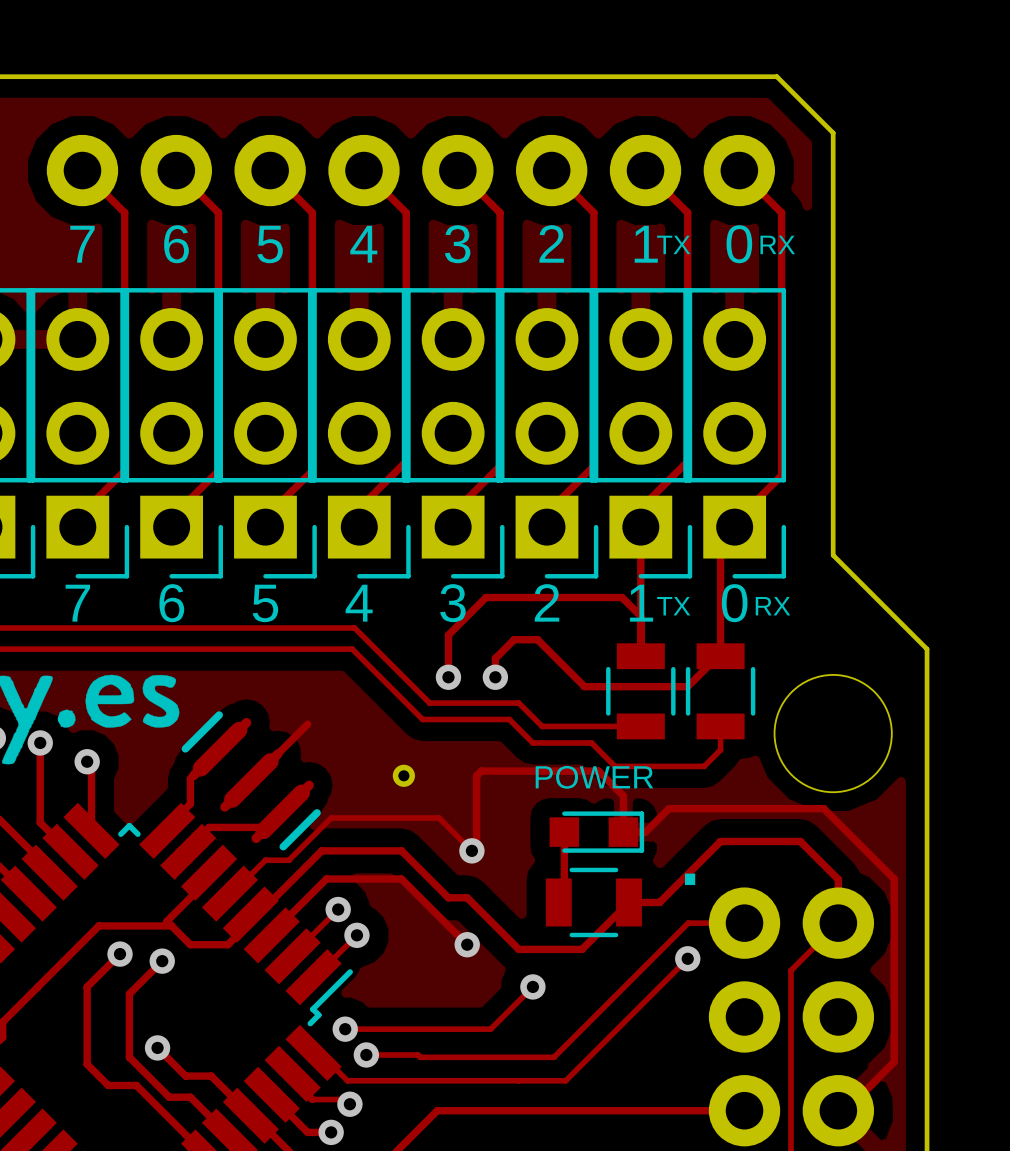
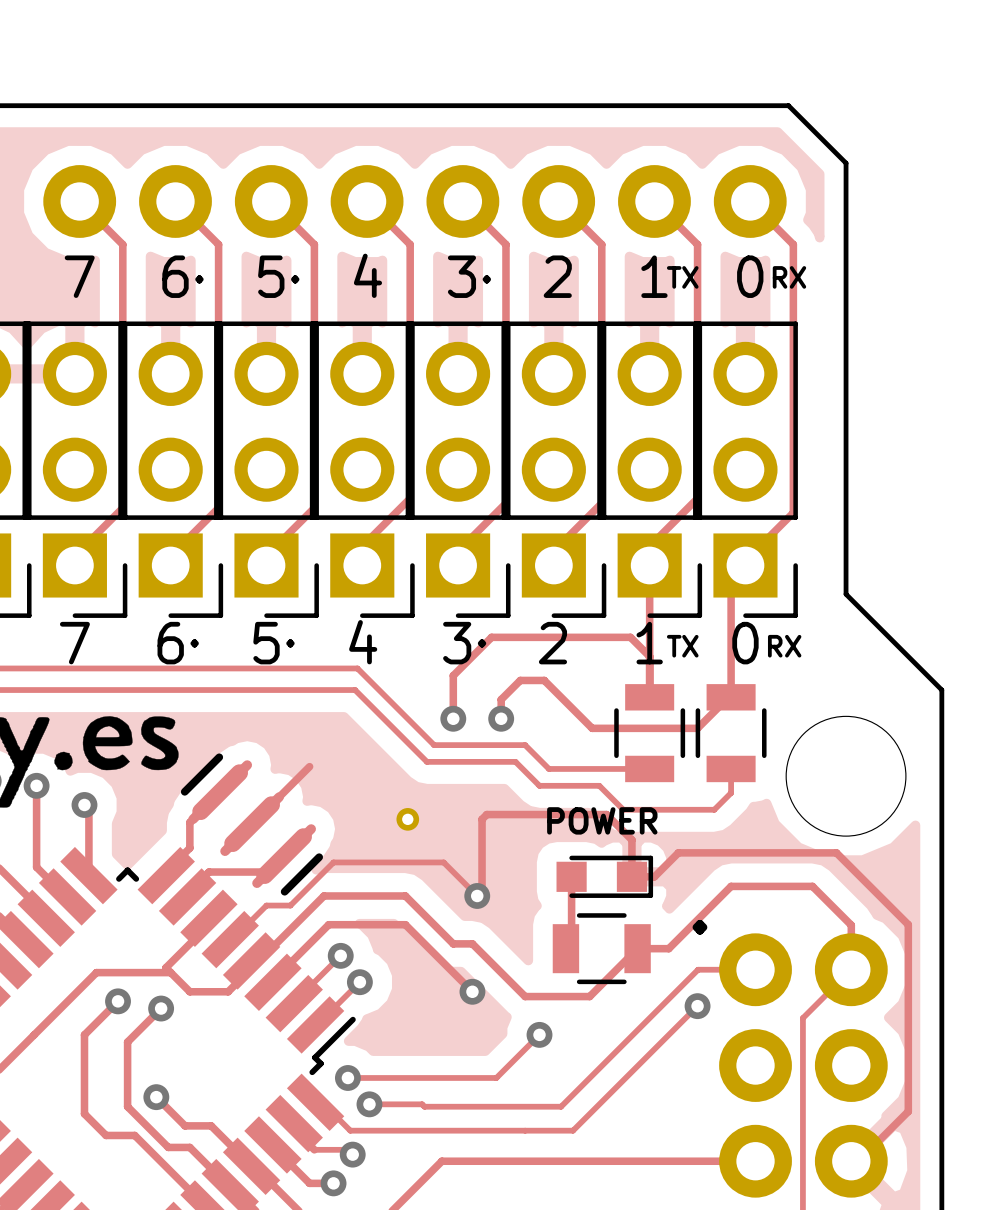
text: none -> . (199, 279)
text: none -> . (295, 279)
text: none -> . (486, 279)
text: none -> . (194, 643)
text: none -> . (290, 643)
text: none -> . (482, 643)

